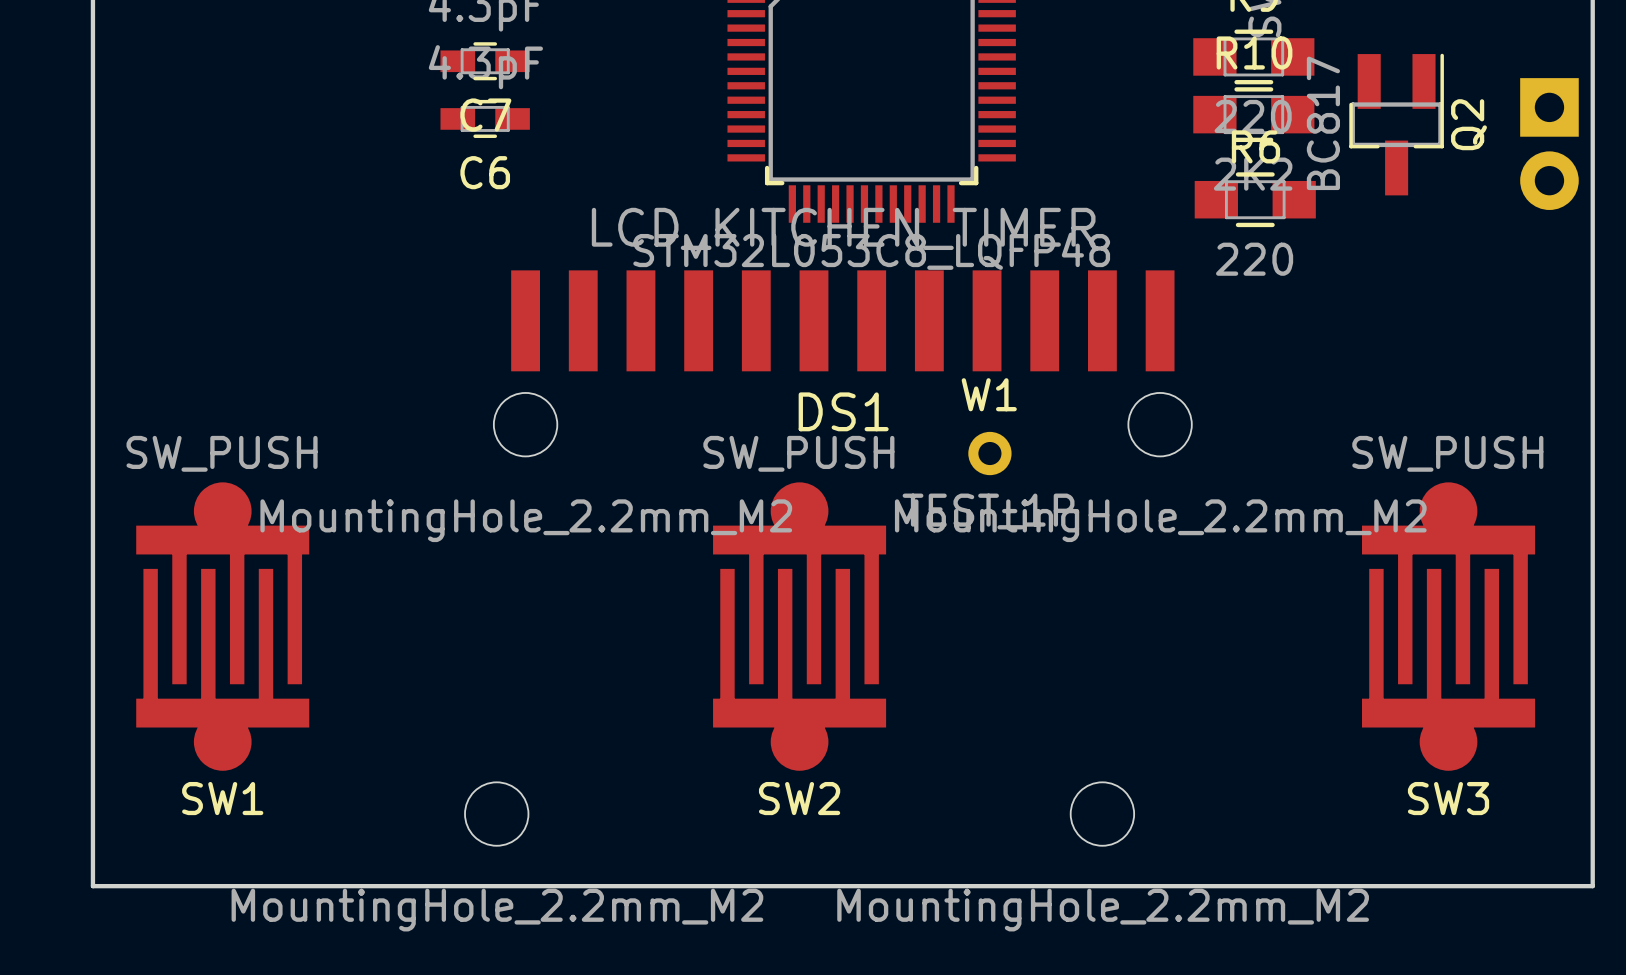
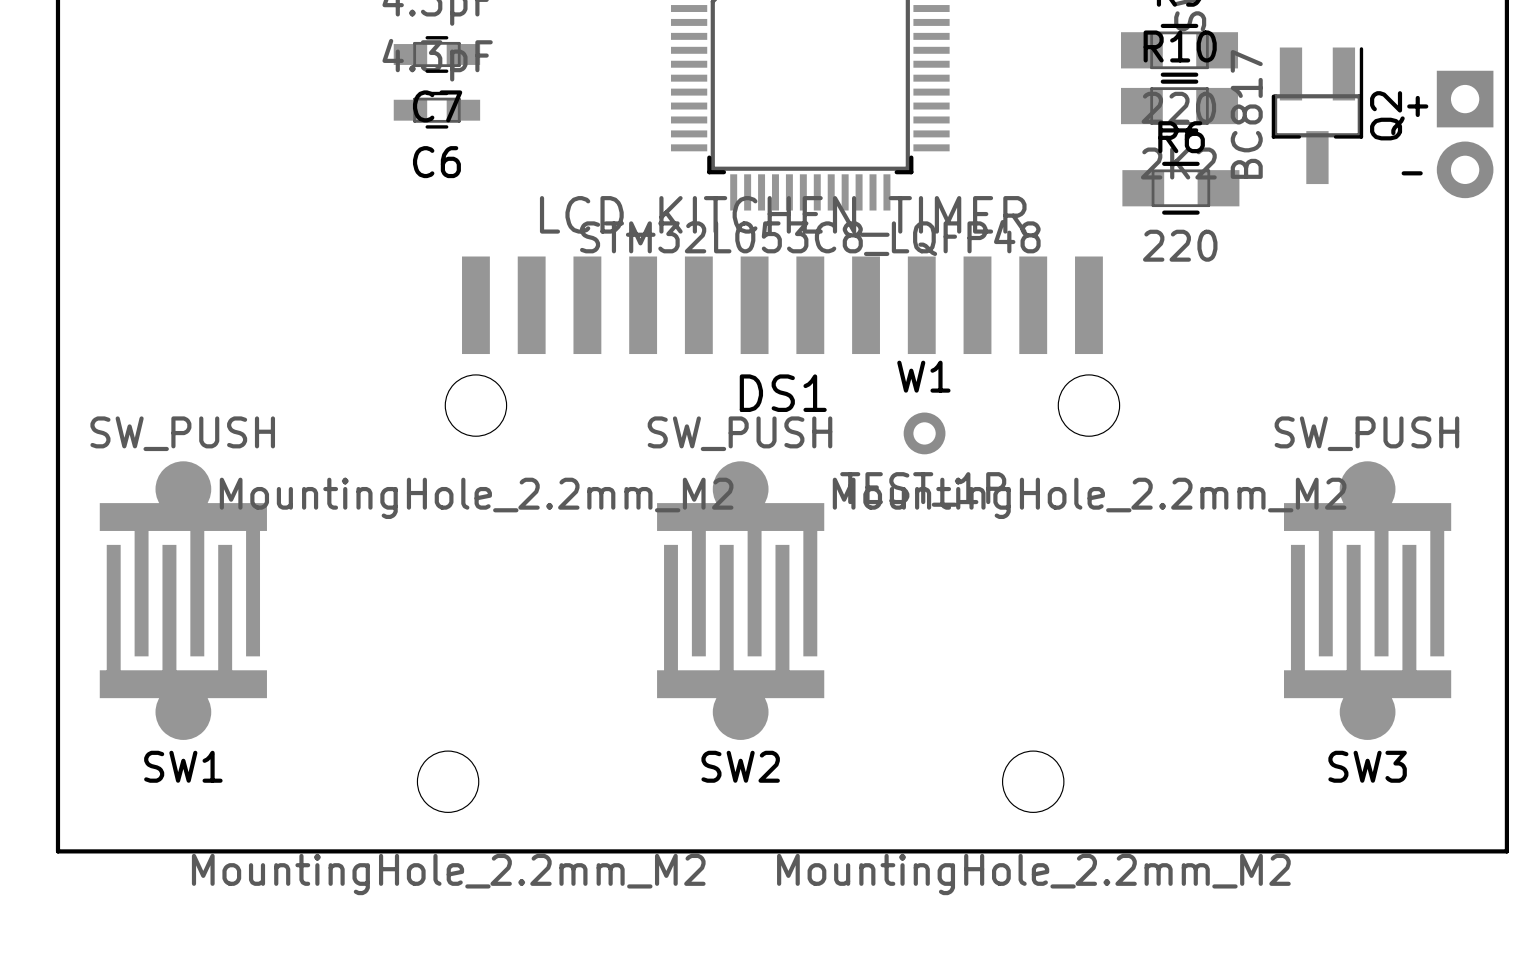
text: none -> + (1417, 106)
text: none -> - (1412, 173)

